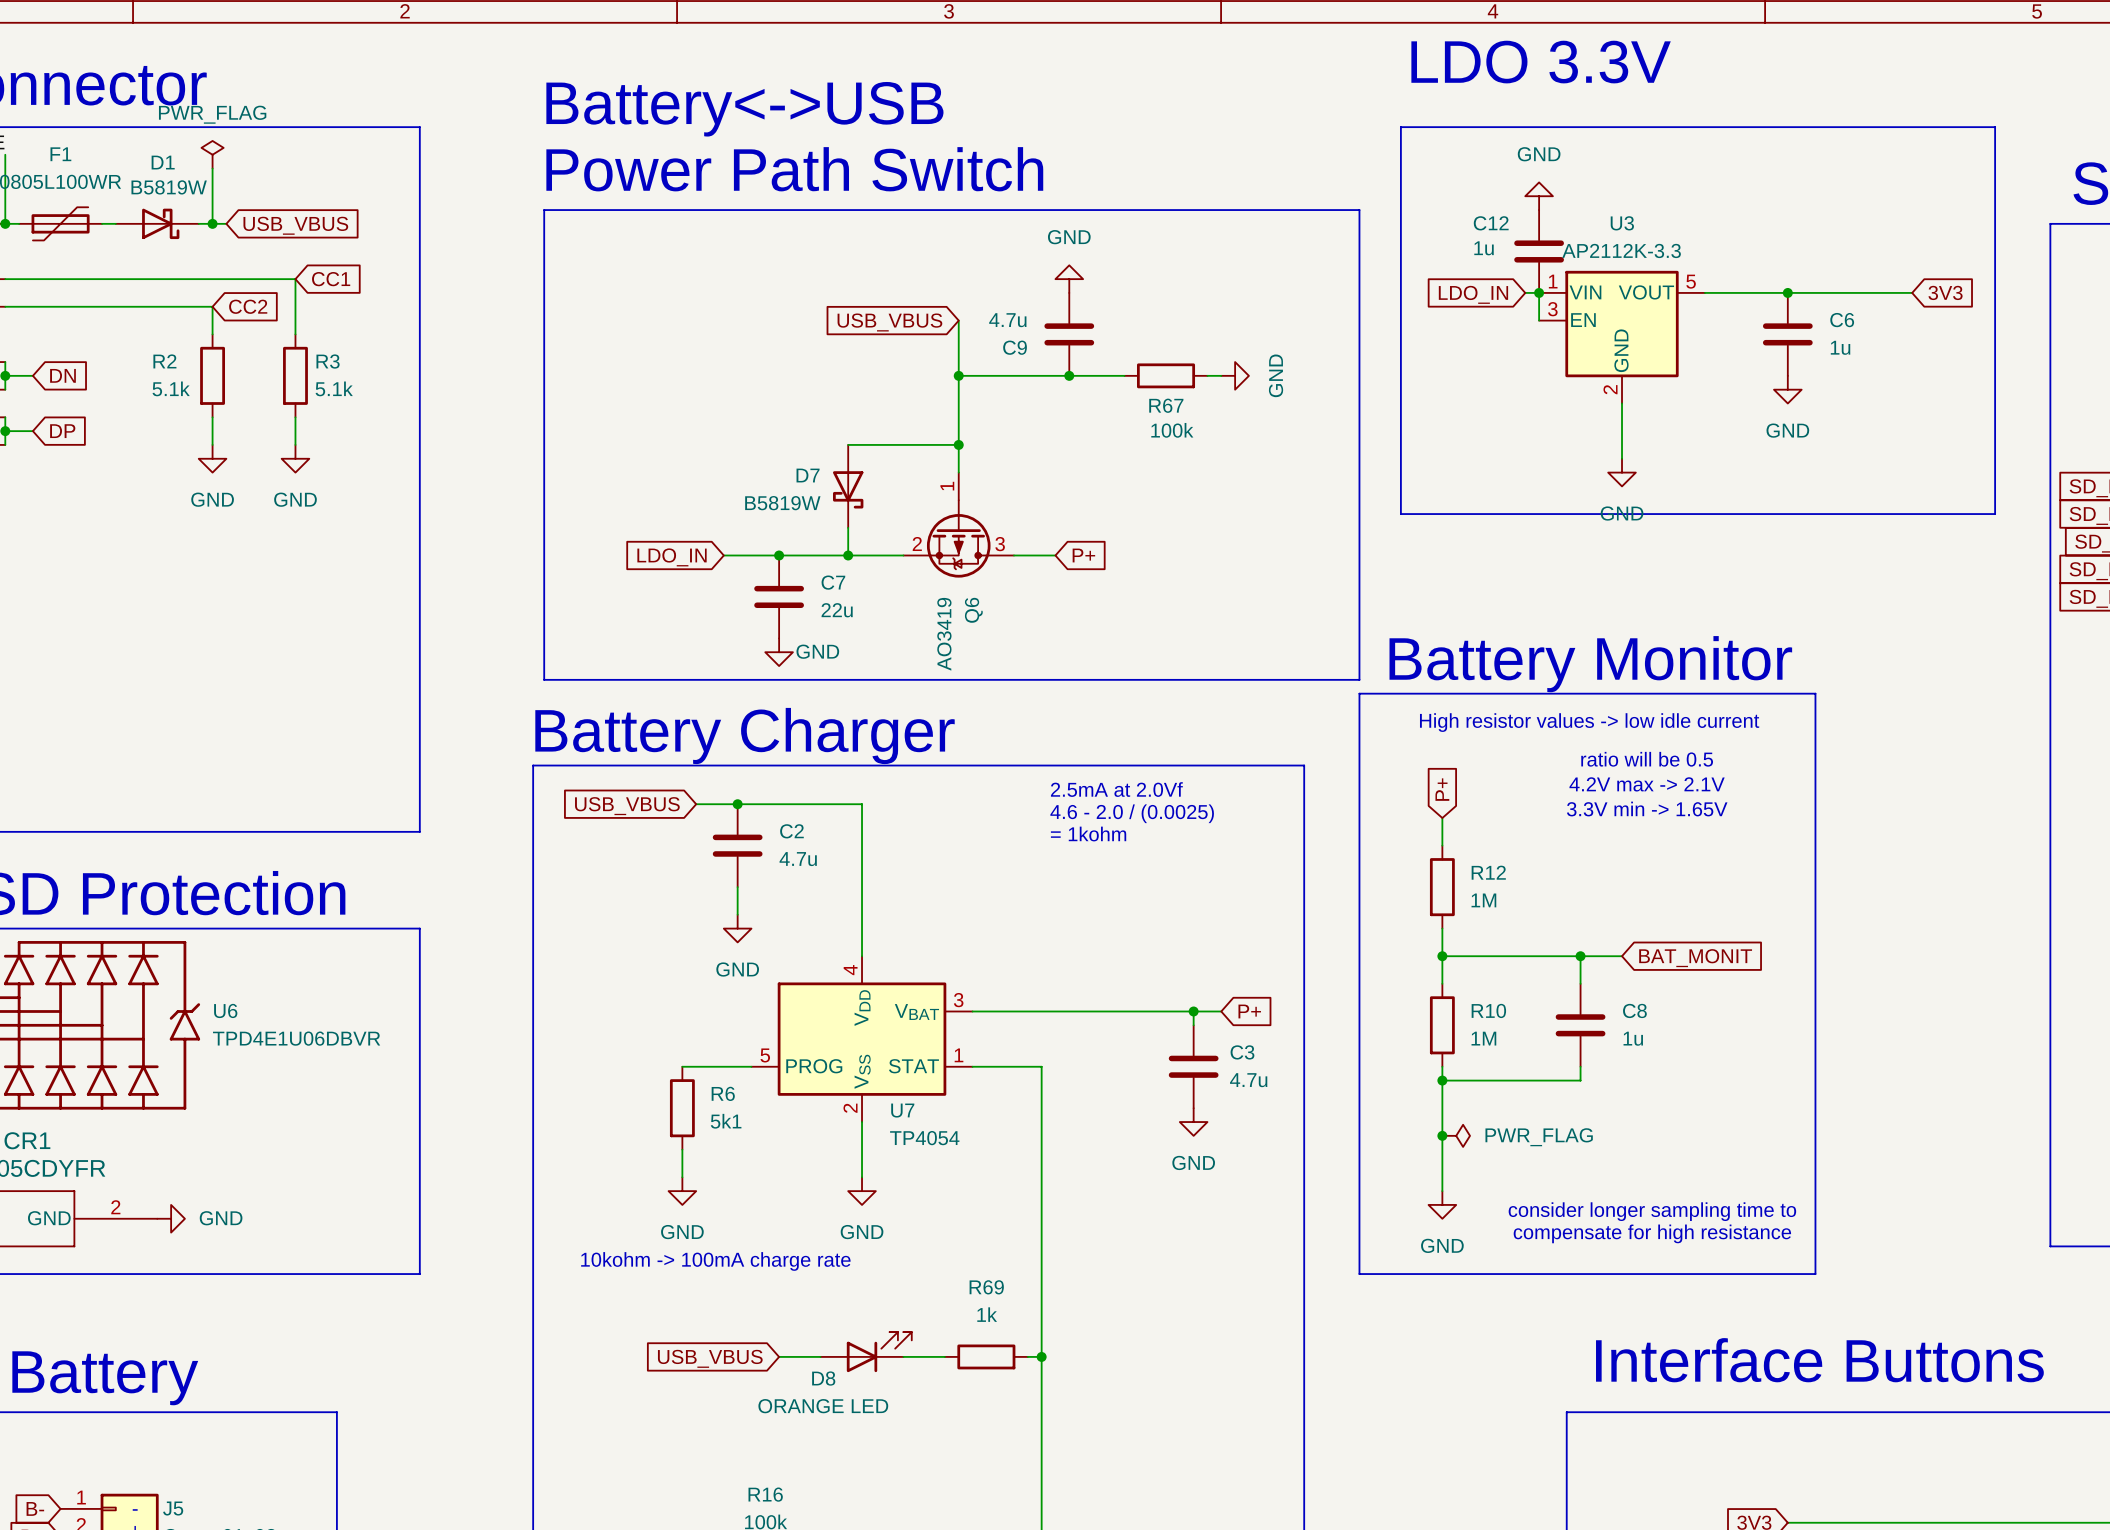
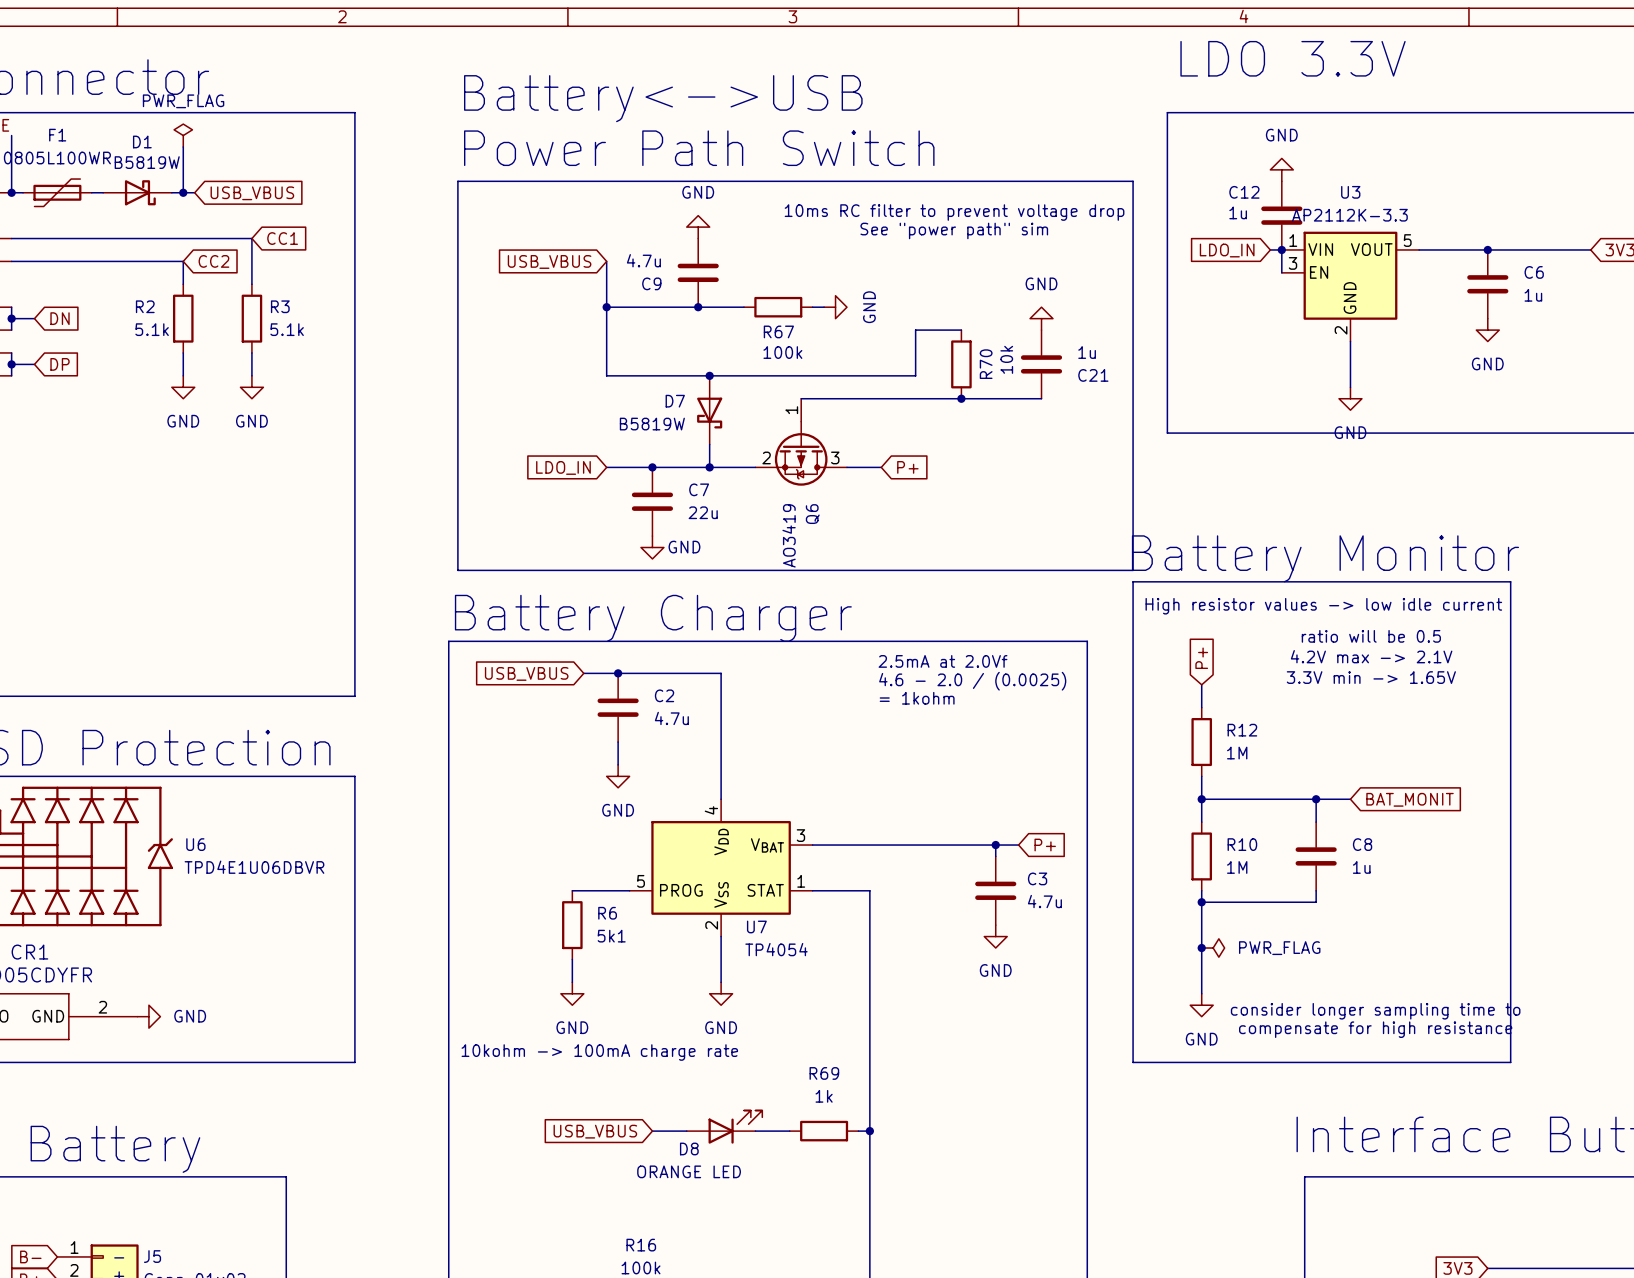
text: none -> 10ms RC filter to prevent voltage drop (954, 212)
power symbol: none -> GND (698, 227)
text: none -> See "power path" sim (954, 230)
power symbol: GND (1069, 279) -> none
wire: none -> (606, 261) (606, 375) (709, 375)
wire: (958, 320) (958, 472) -> (1041, 398) (801, 398)
global label position: USB_VBUS (889, 322) -> USB_VBUS (549, 261)
C9 position: (1069, 334) -> (698, 272)
junction: none -> (606, 307)
junction: none -> (698, 307)
power symbol: none -> GND (835, 307)
wire: (958, 375) (1124, 375) -> (606, 307) (743, 307)
junction: (958, 375) -> none
junction: (1069, 375) -> none
R67 position: (1166, 375) -> (778, 307)
wire: (1207, 375) (1221, 375) -> (812, 307) (824, 307)
power symbol rotation: 0° (1235, 375) -> 90° counterclockwise (1041, 318)
wire: none -> (961, 330) (915, 330) (915, 375) (801, 375)
R70: none -> 10k (961, 364)
C21: none -> 1u (1041, 364)
junction: none -> (709, 375)
junction: (958, 444) -> none
junction: none -> (961, 398)

